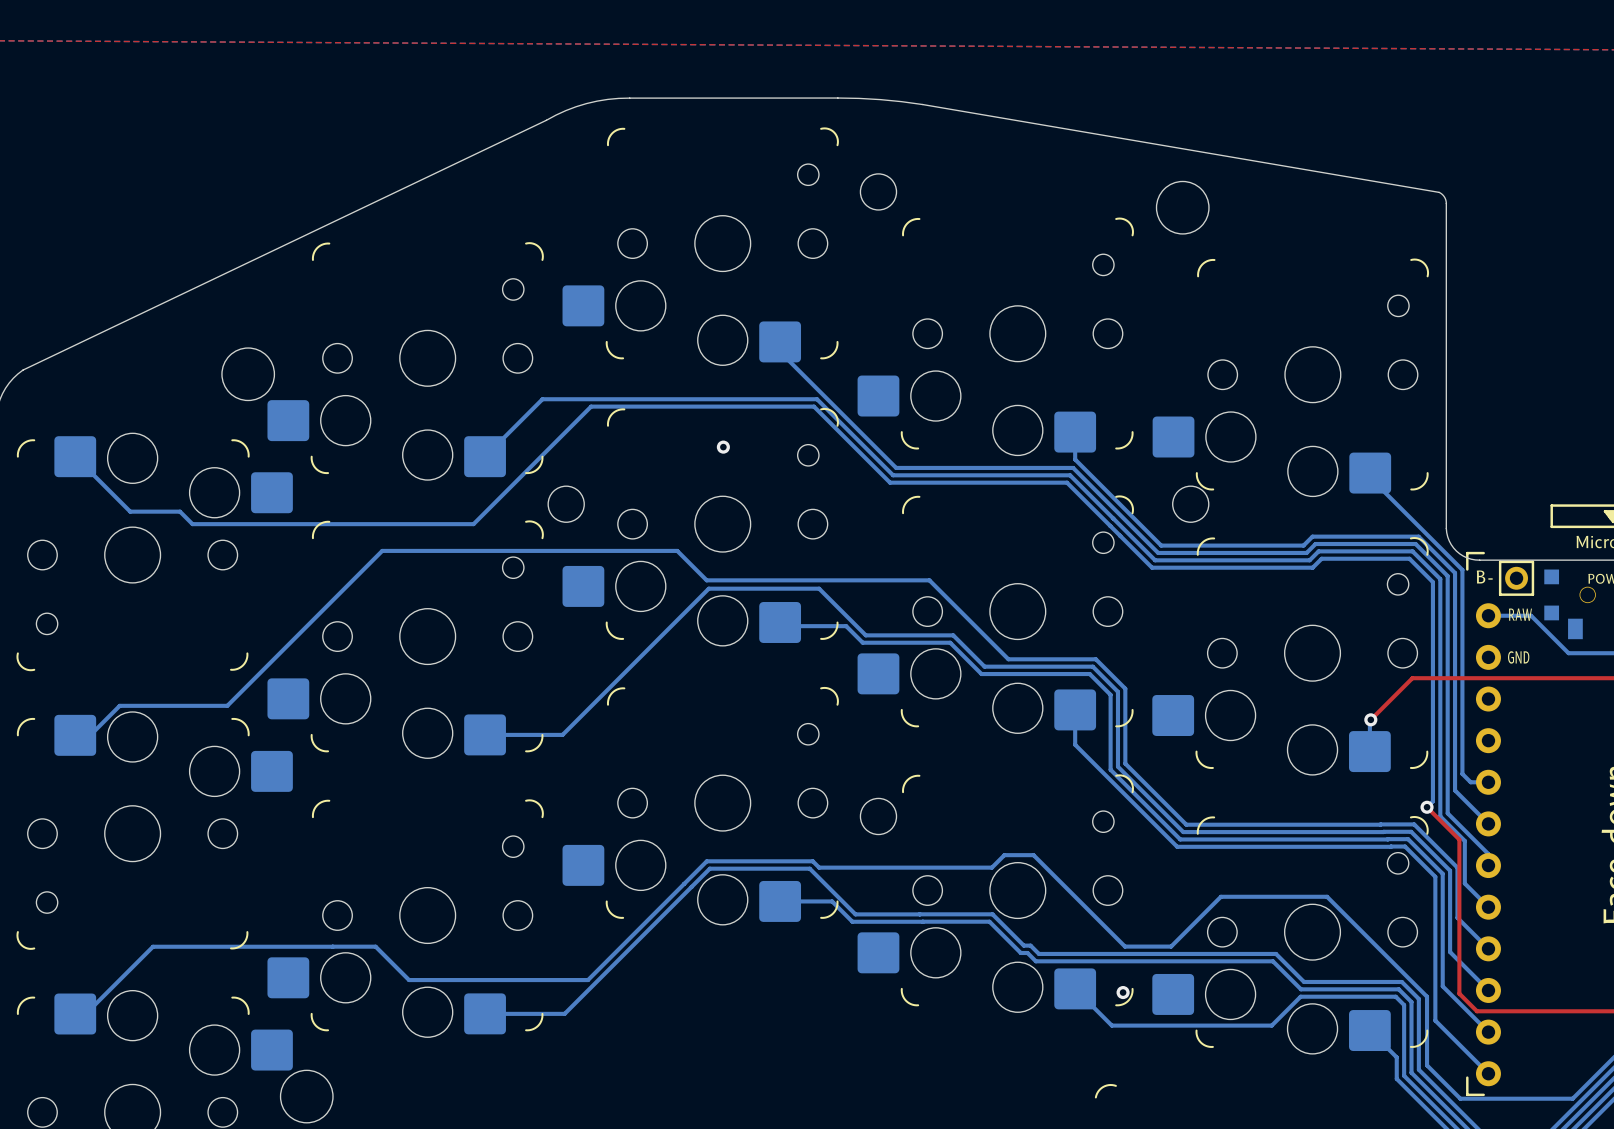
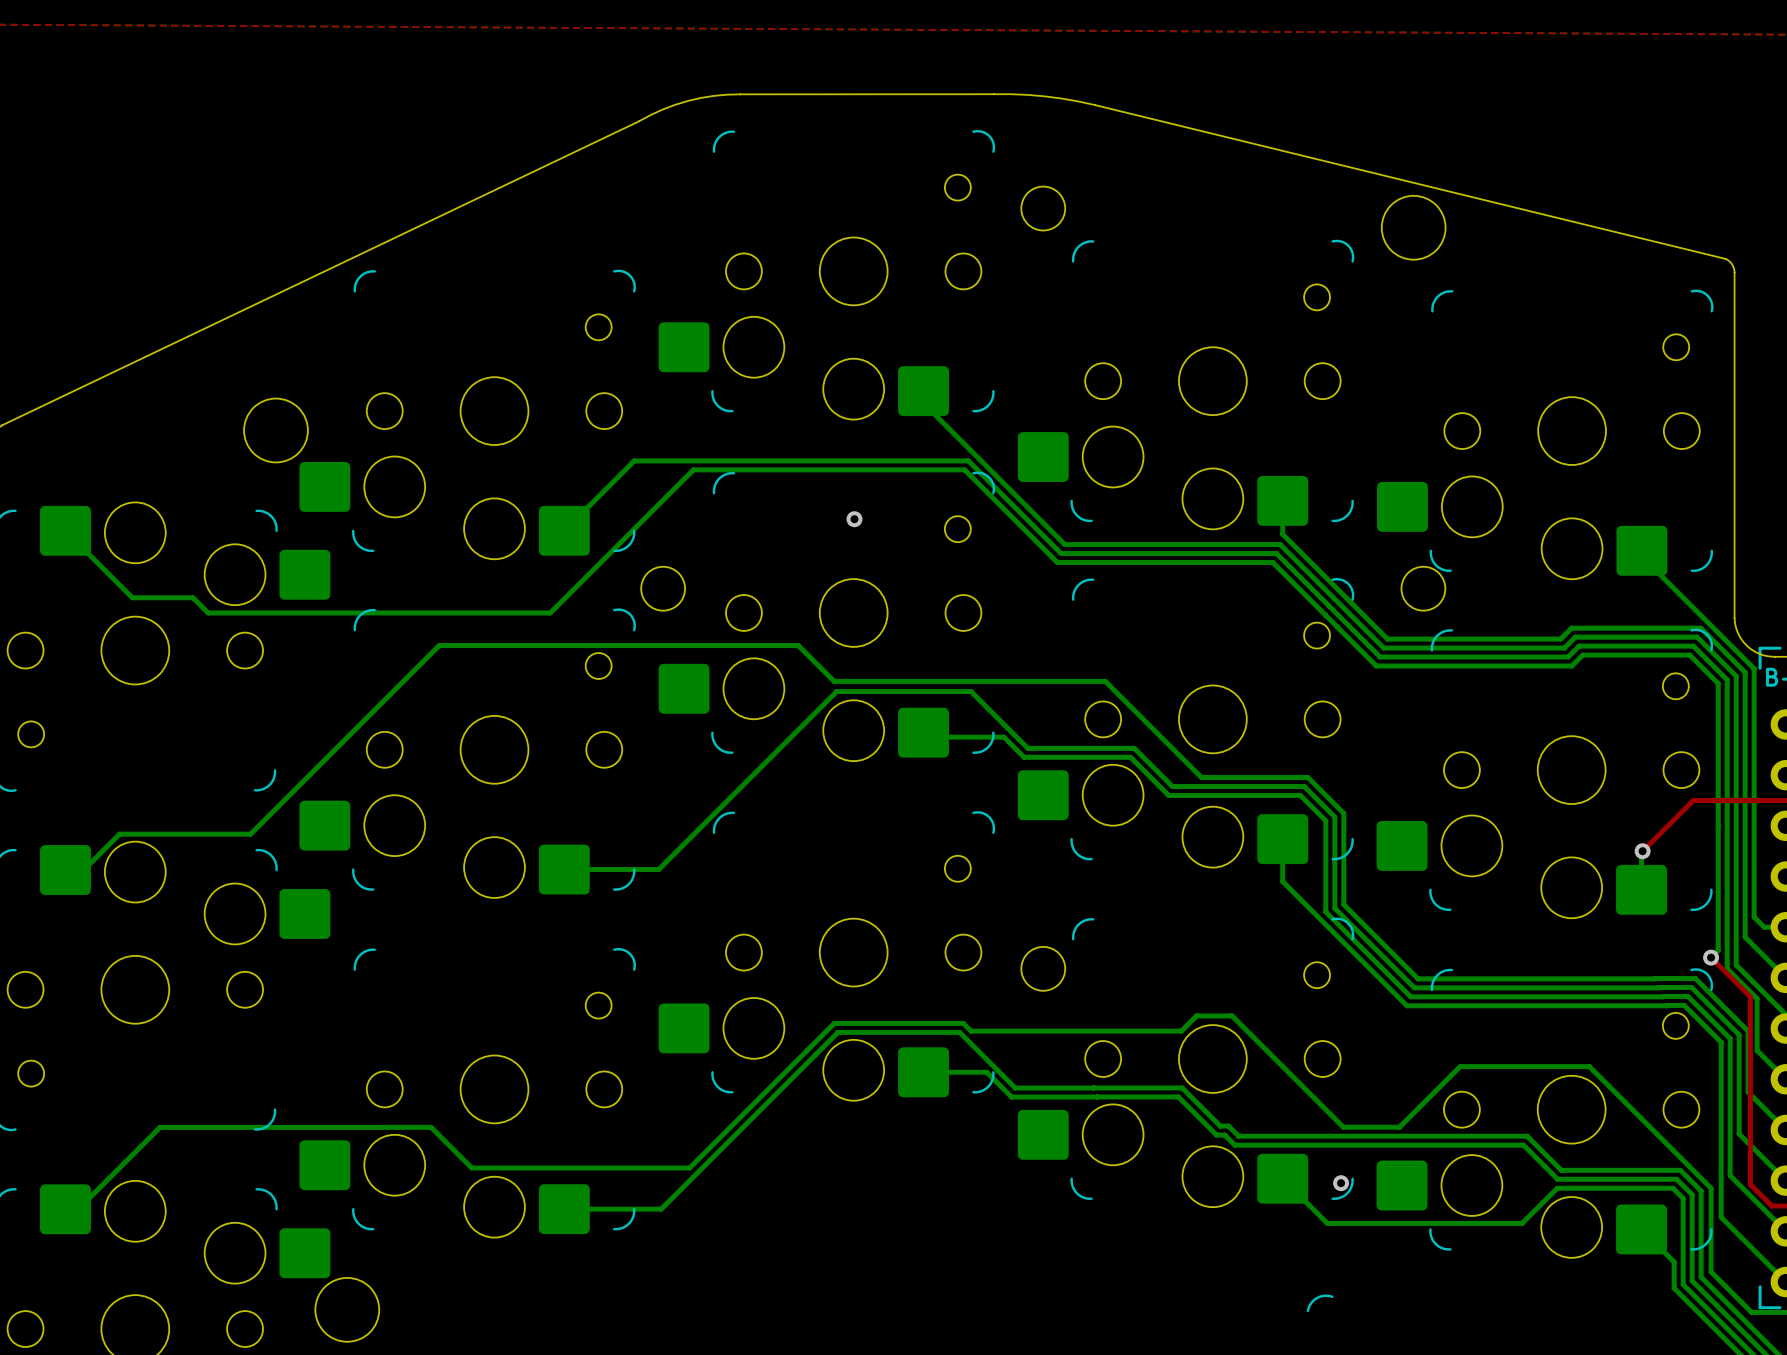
board edge: (837, 98) (880, 99) (922, 104) (1439, 192) (1444, 196) (1446, 202) (1446, 244) -> (993, 94) (1044, 96) (1095, 105) (1725, 258) (1732, 264) (1734, 272)

